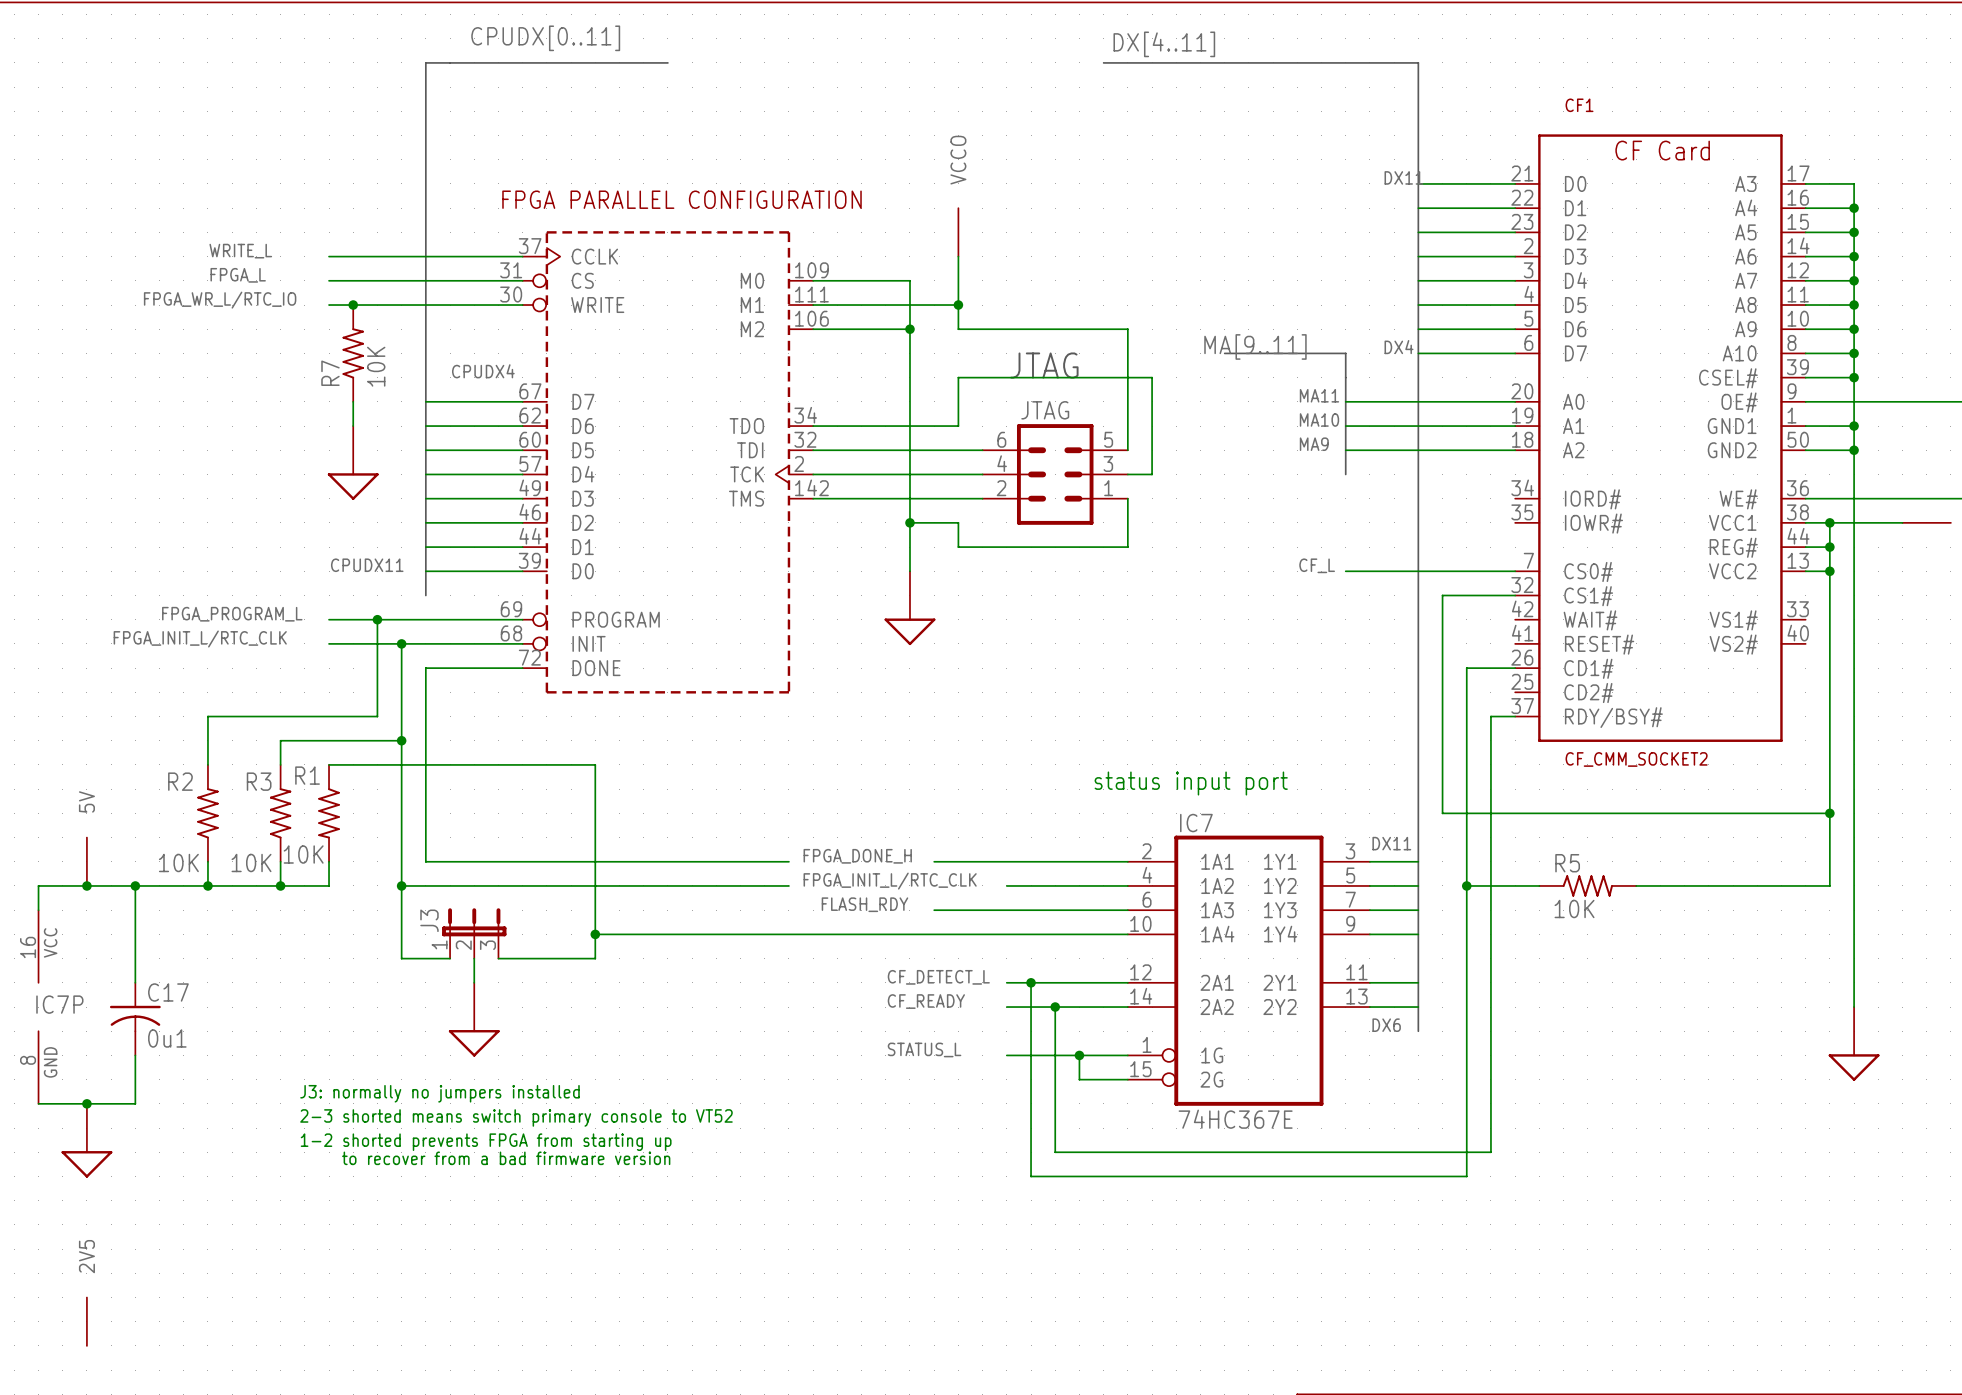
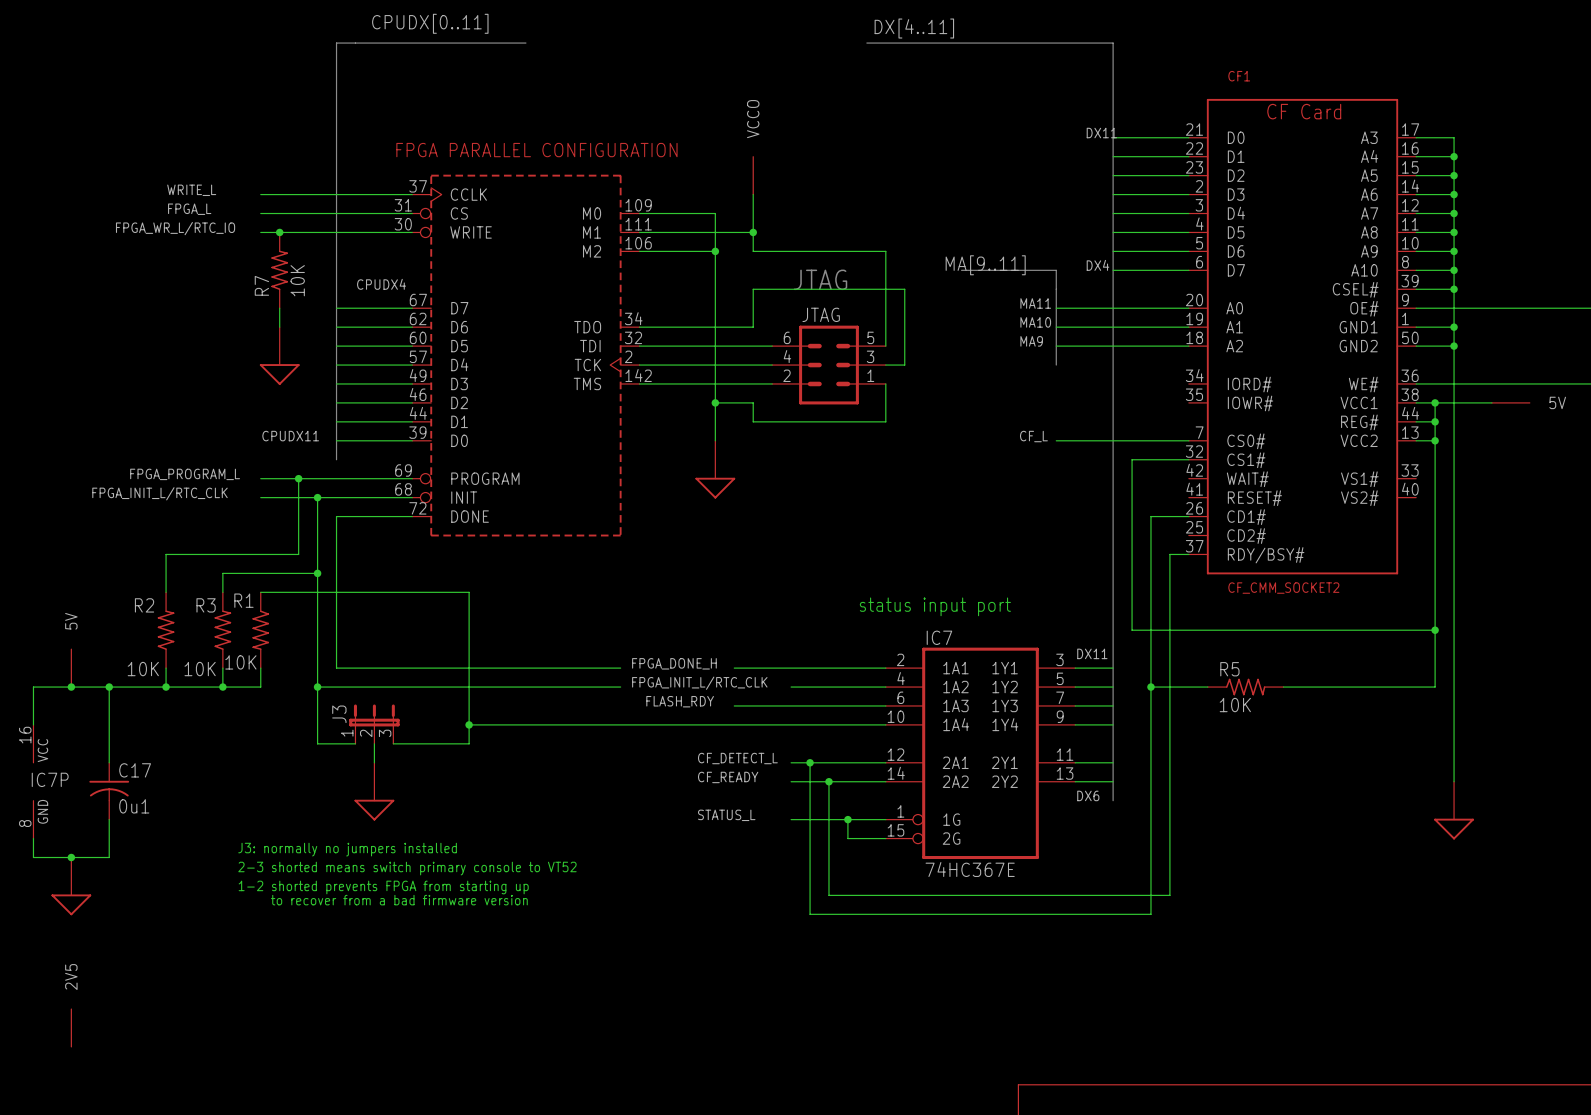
IC7P symbol: [38, 910, 39, 1104] -> [33, 724, 34, 839]

